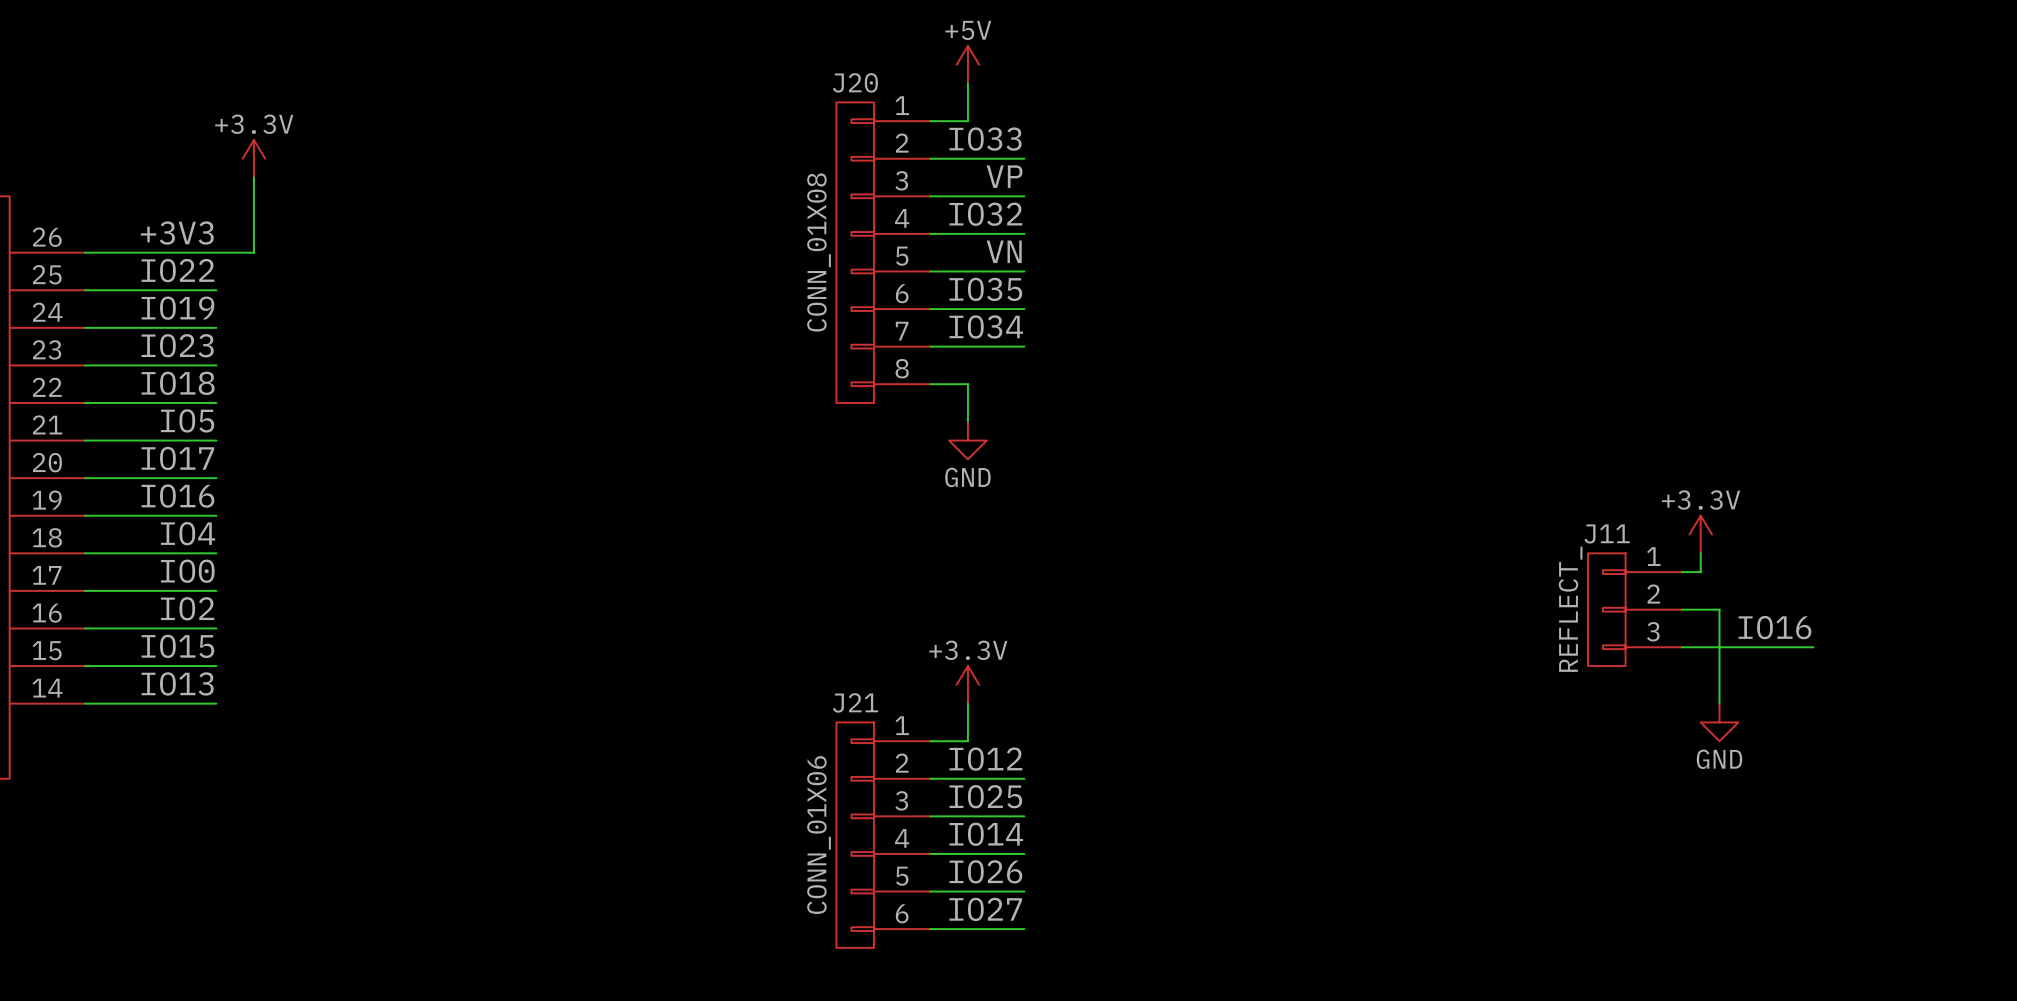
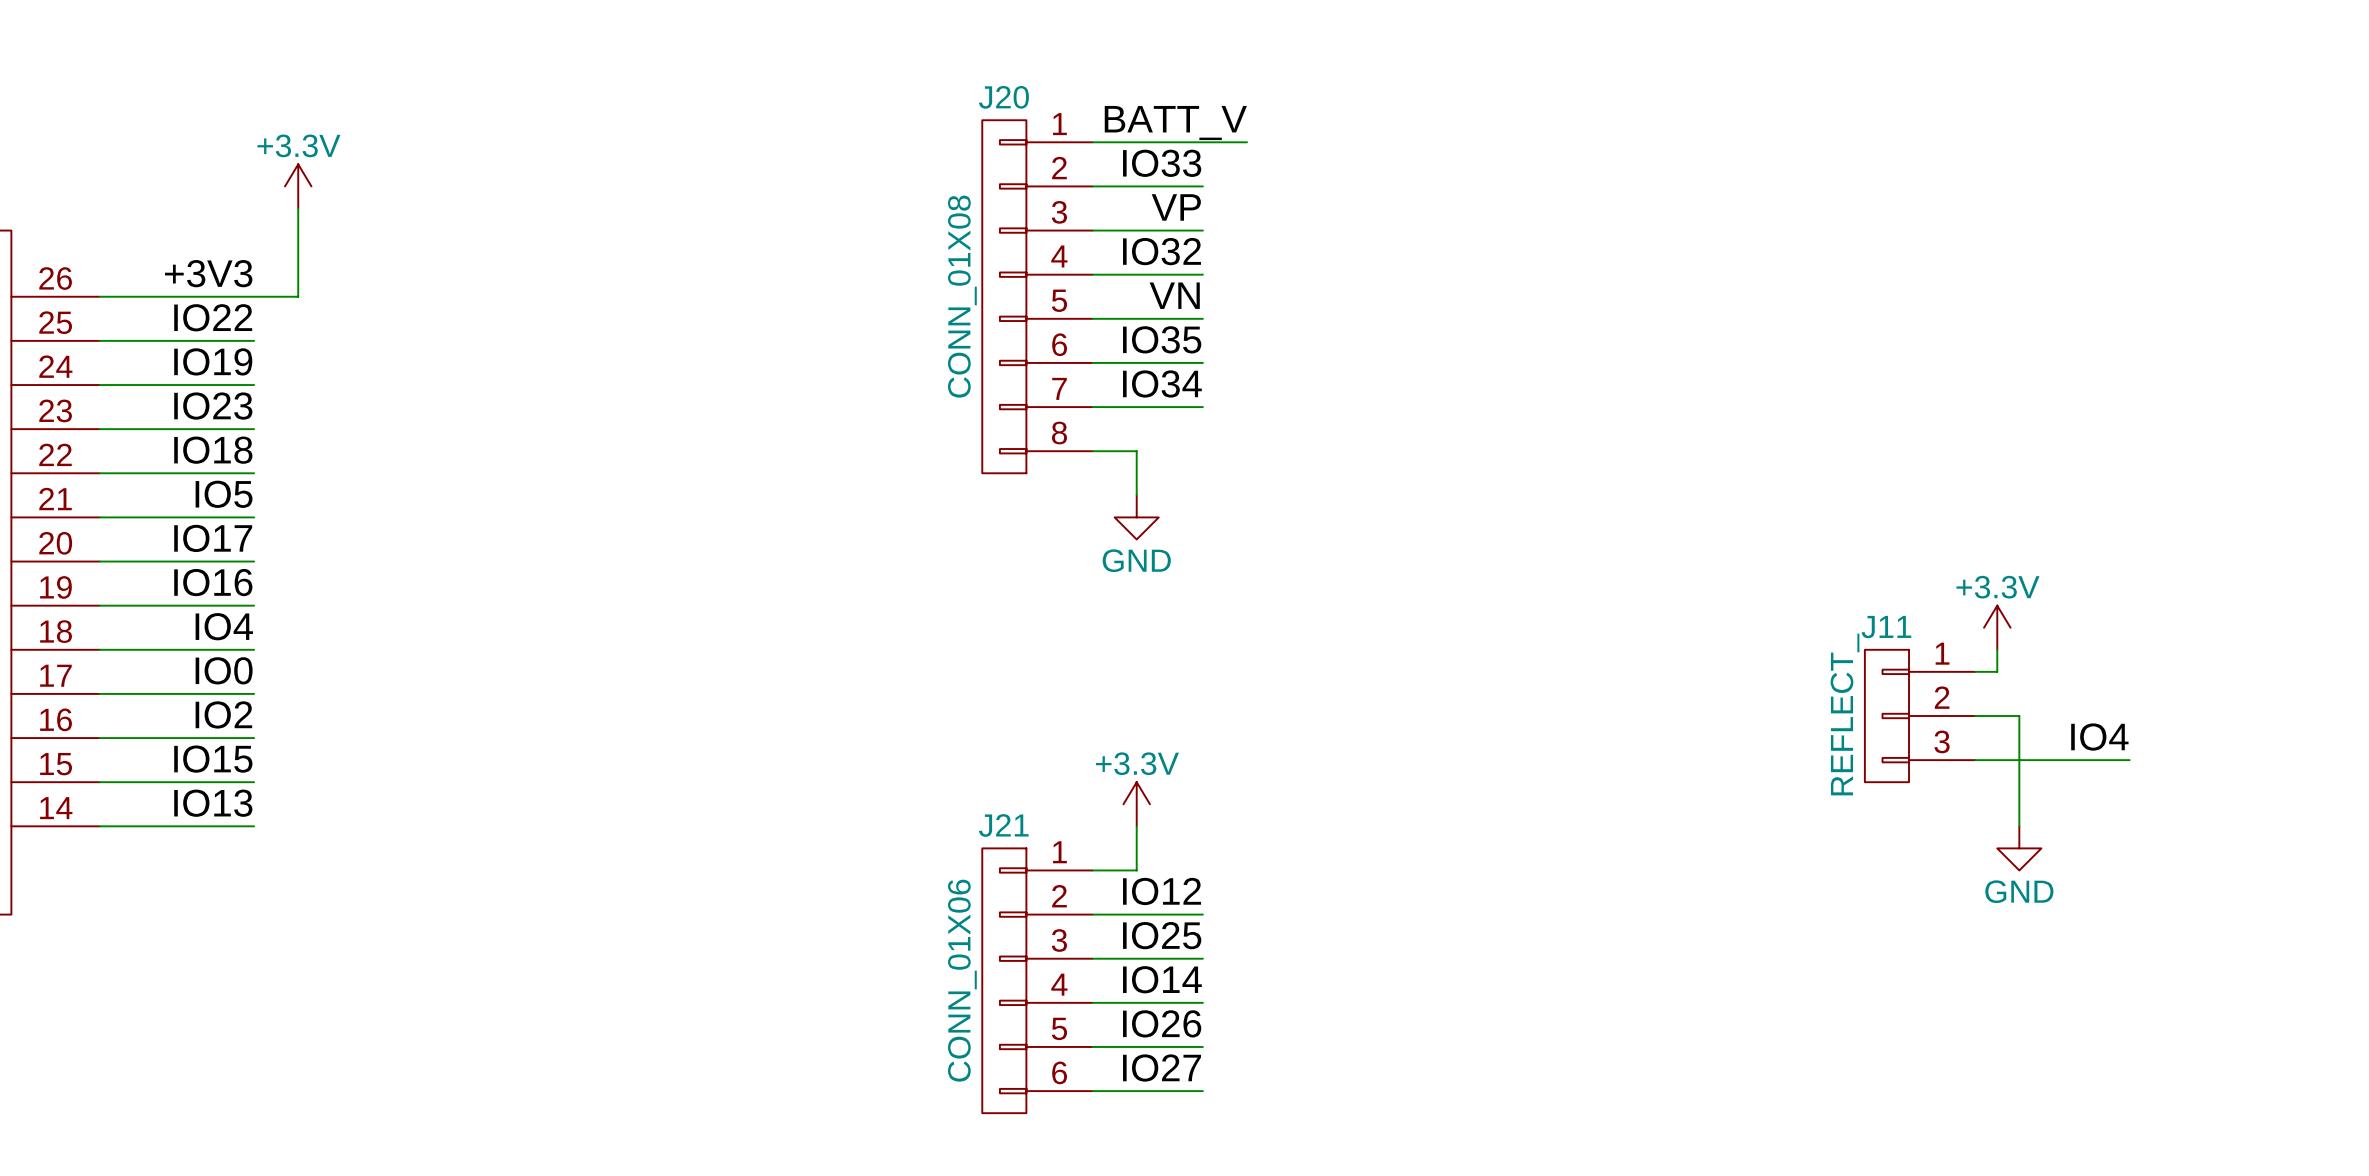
power symbol: +5V (967, 64) -> none
wire: (967, 83) (967, 121) -> (1247, 142) (1136, 142)
label: none -> BATT_V (1175, 123)
label: IO16 (1775, 627) -> IO4 (2099, 737)

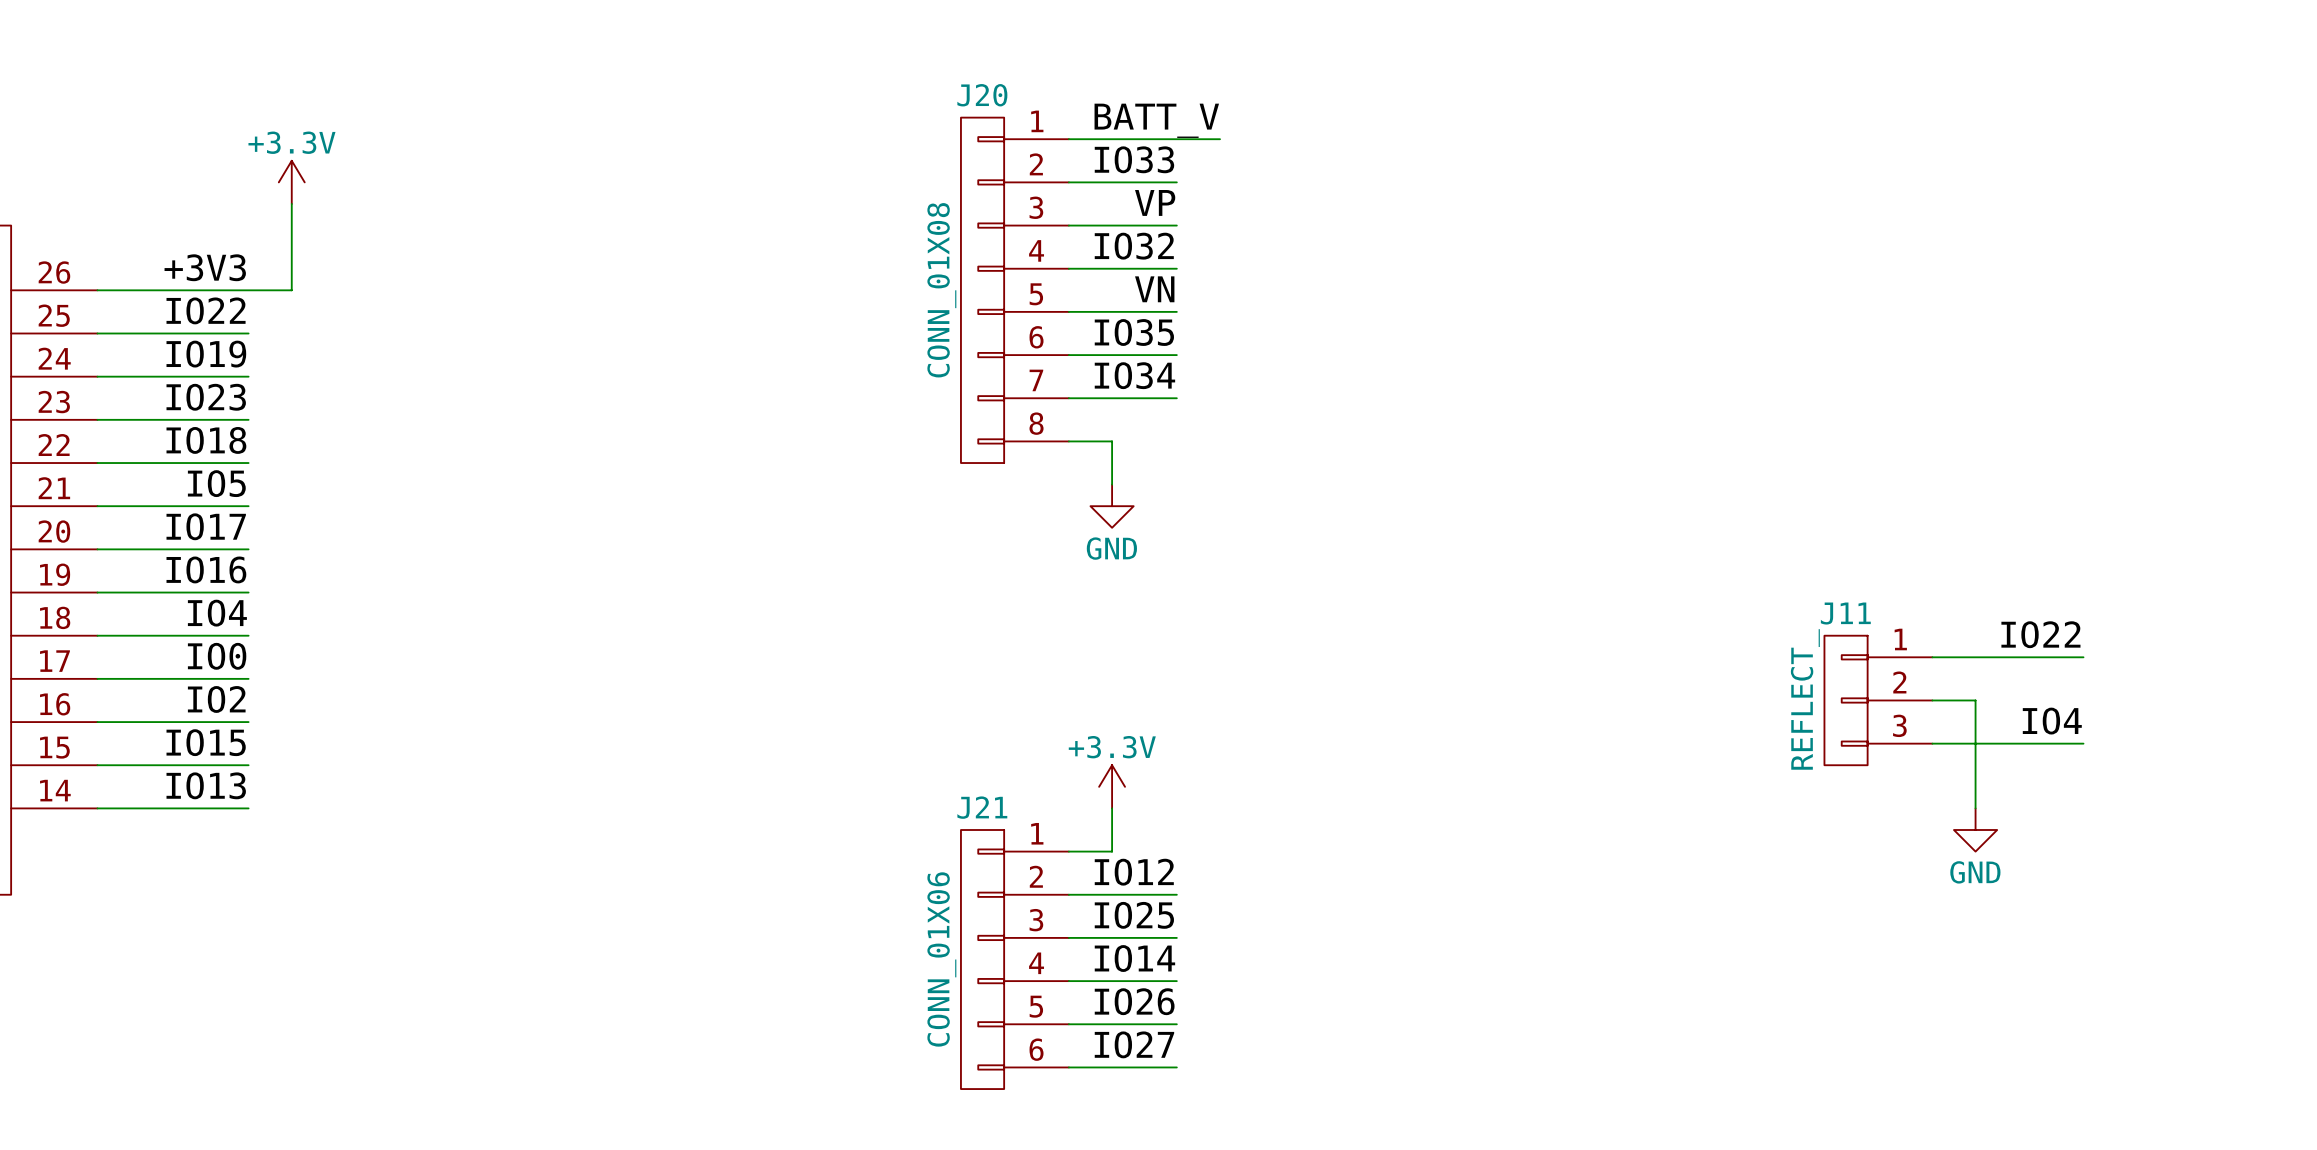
power symbol: +3.3V (1997, 627) -> none
label: none -> IO22 (2040, 634)
wire: (1997, 649) (1997, 671) -> (2083, 657) (1953, 657)

